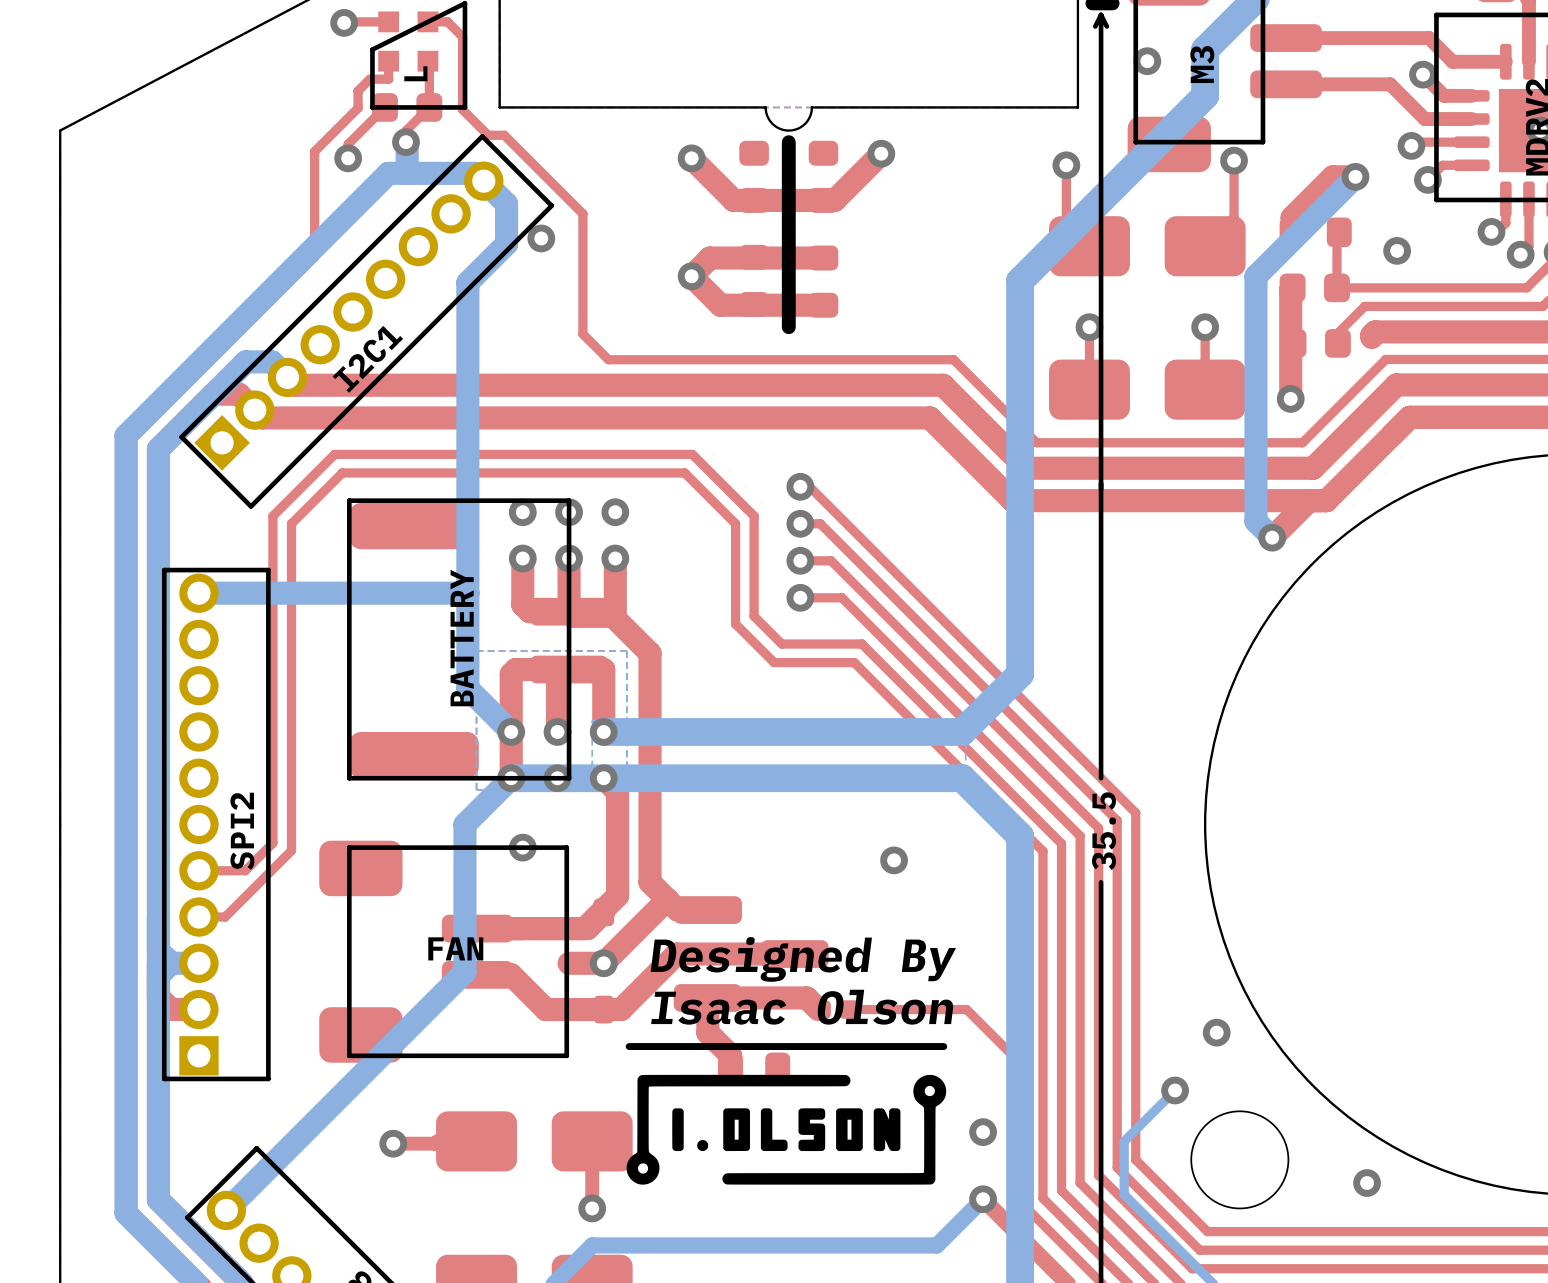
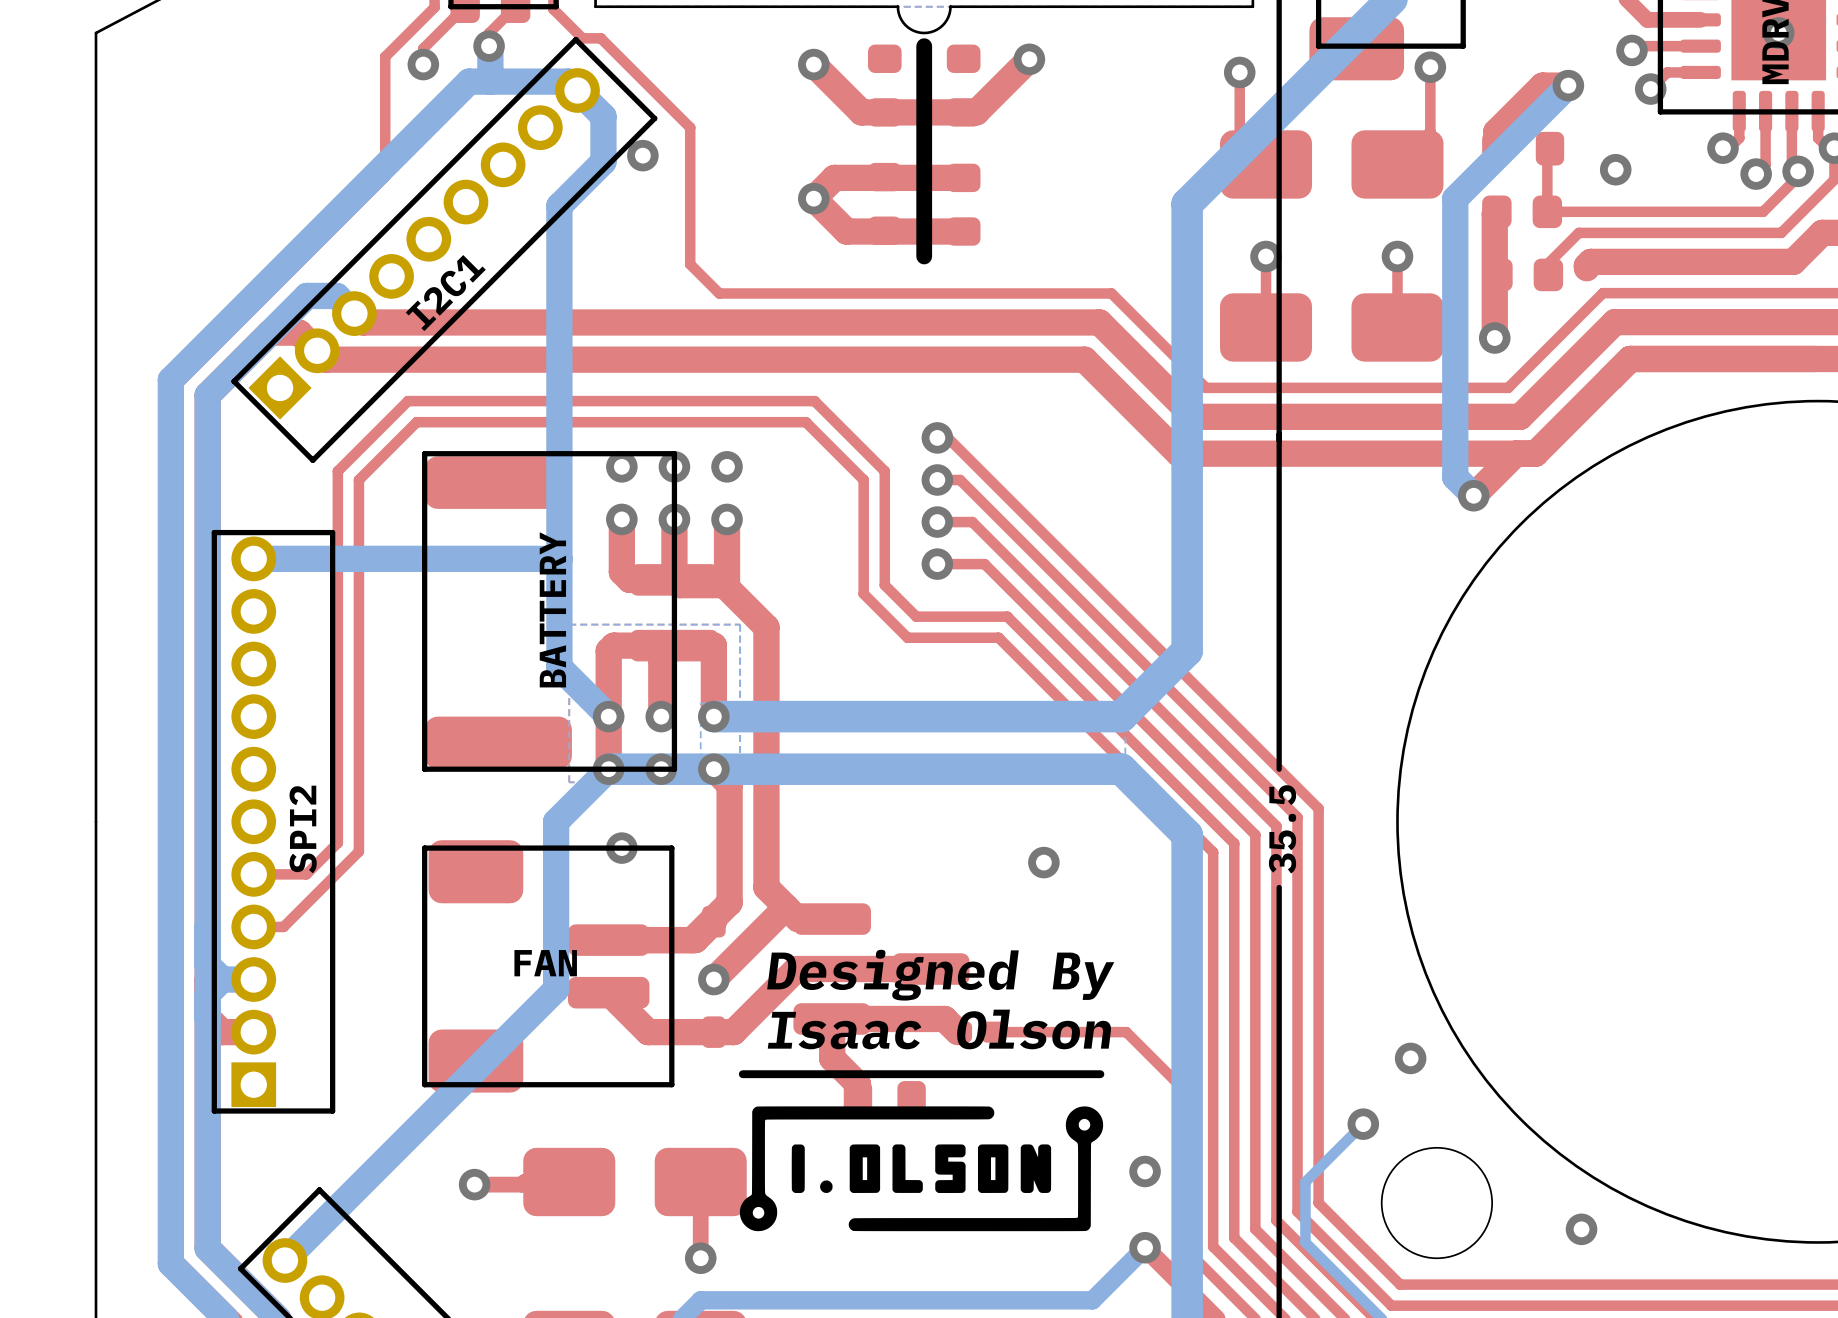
part position: (416, 951) -> (539, 966)
top track: (603, 963) (569, 963) -> none

